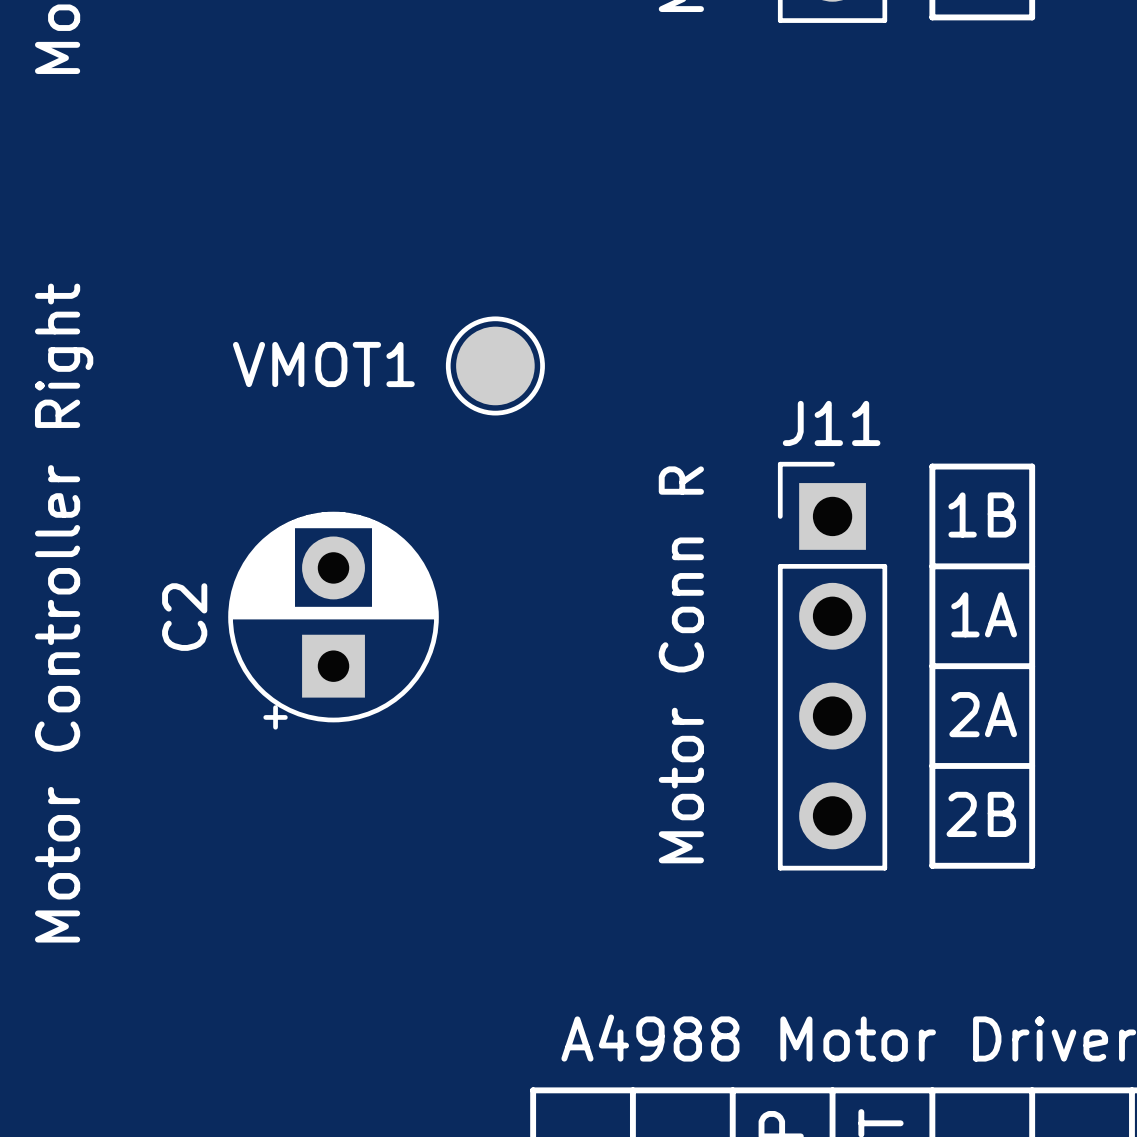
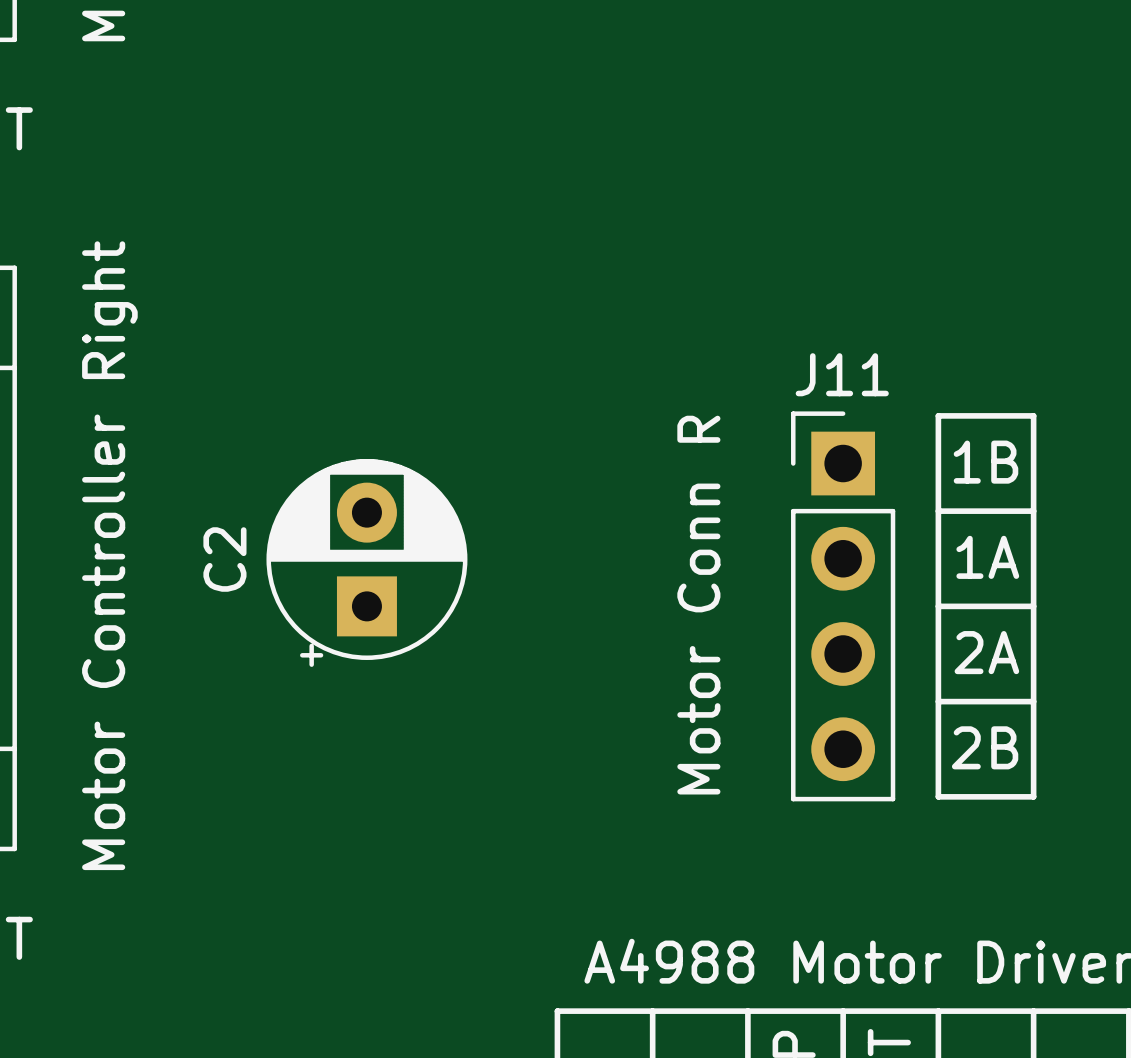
VMOT1: (495, 365) -> none

